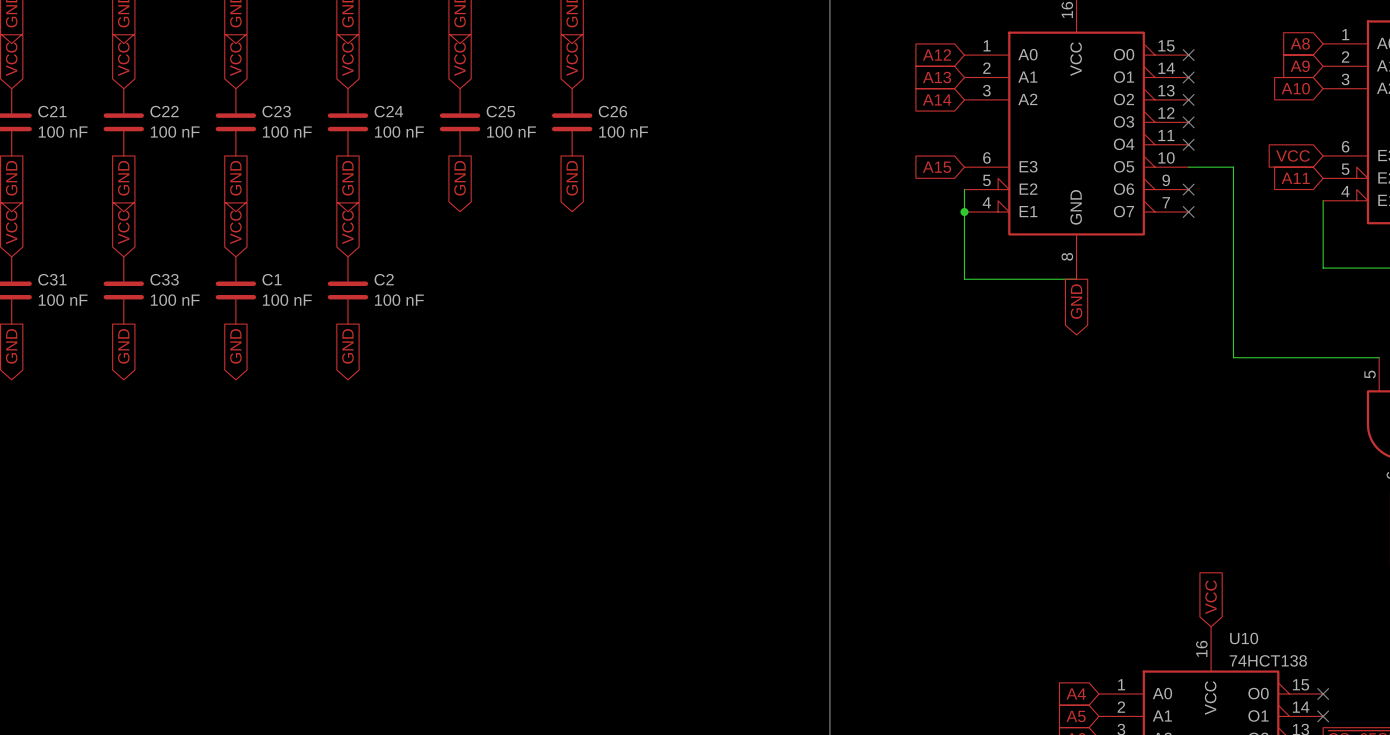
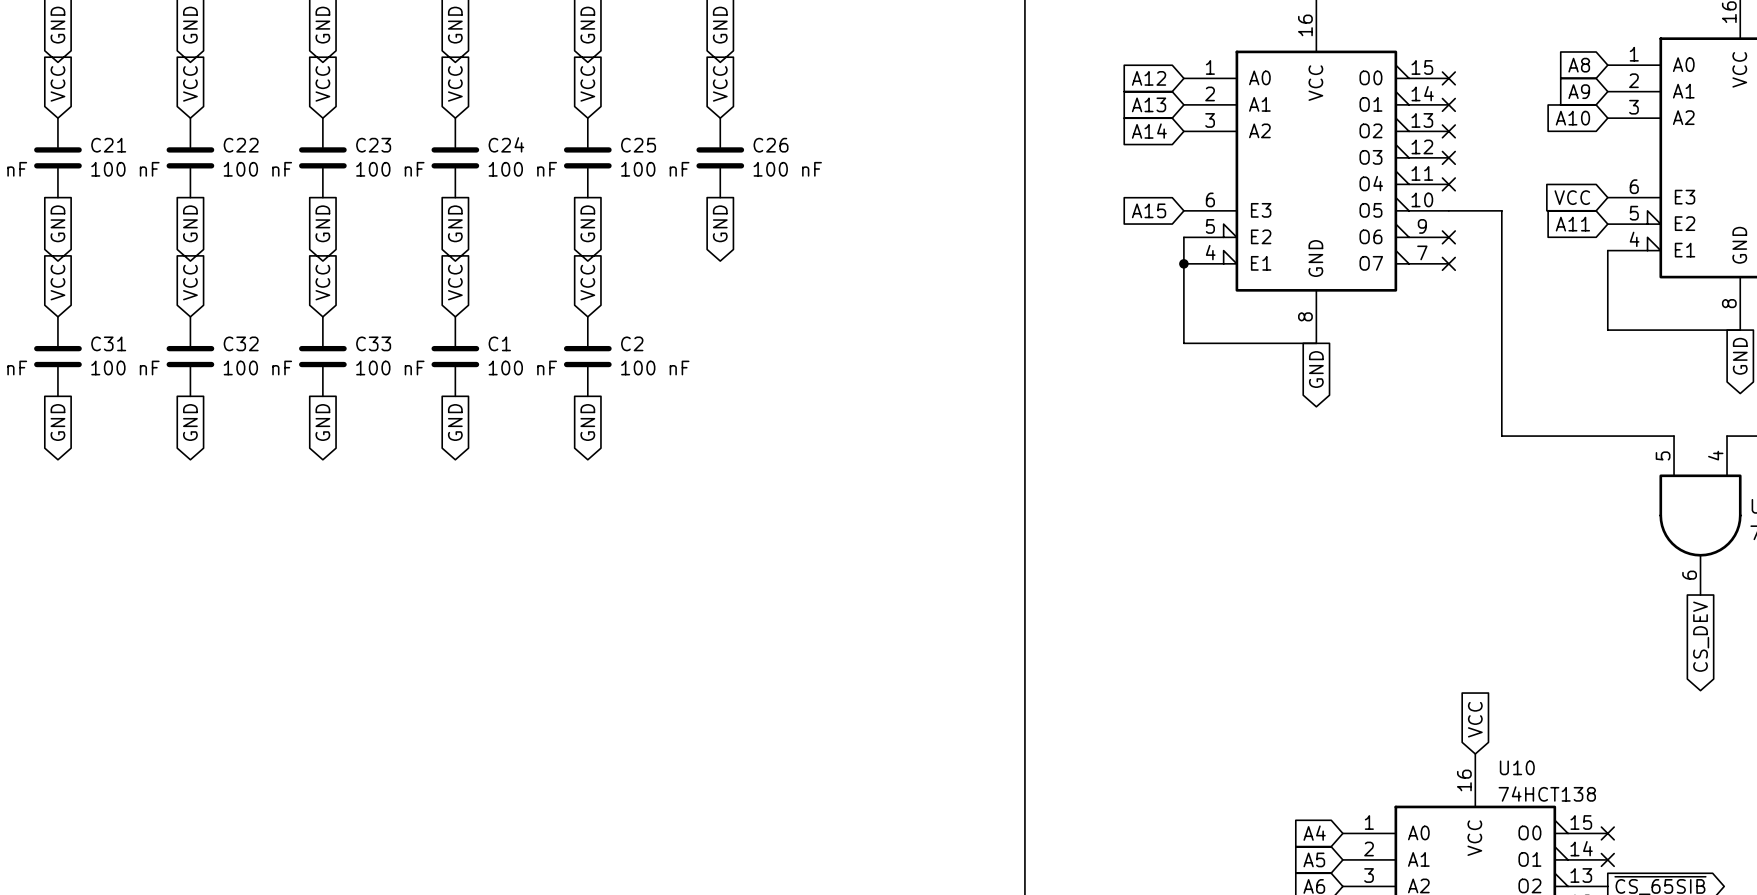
global label: none -> VCC (587, 282)
C33 name: C33 (164, 279) -> C32 (241, 343)
C1 name: C1 (272, 279) -> C33 (373, 343)
C2 name: C2 (384, 279) -> C1 (499, 343)
C2: none -> 100 nF (587, 356)
global label: none -> GND (587, 422)

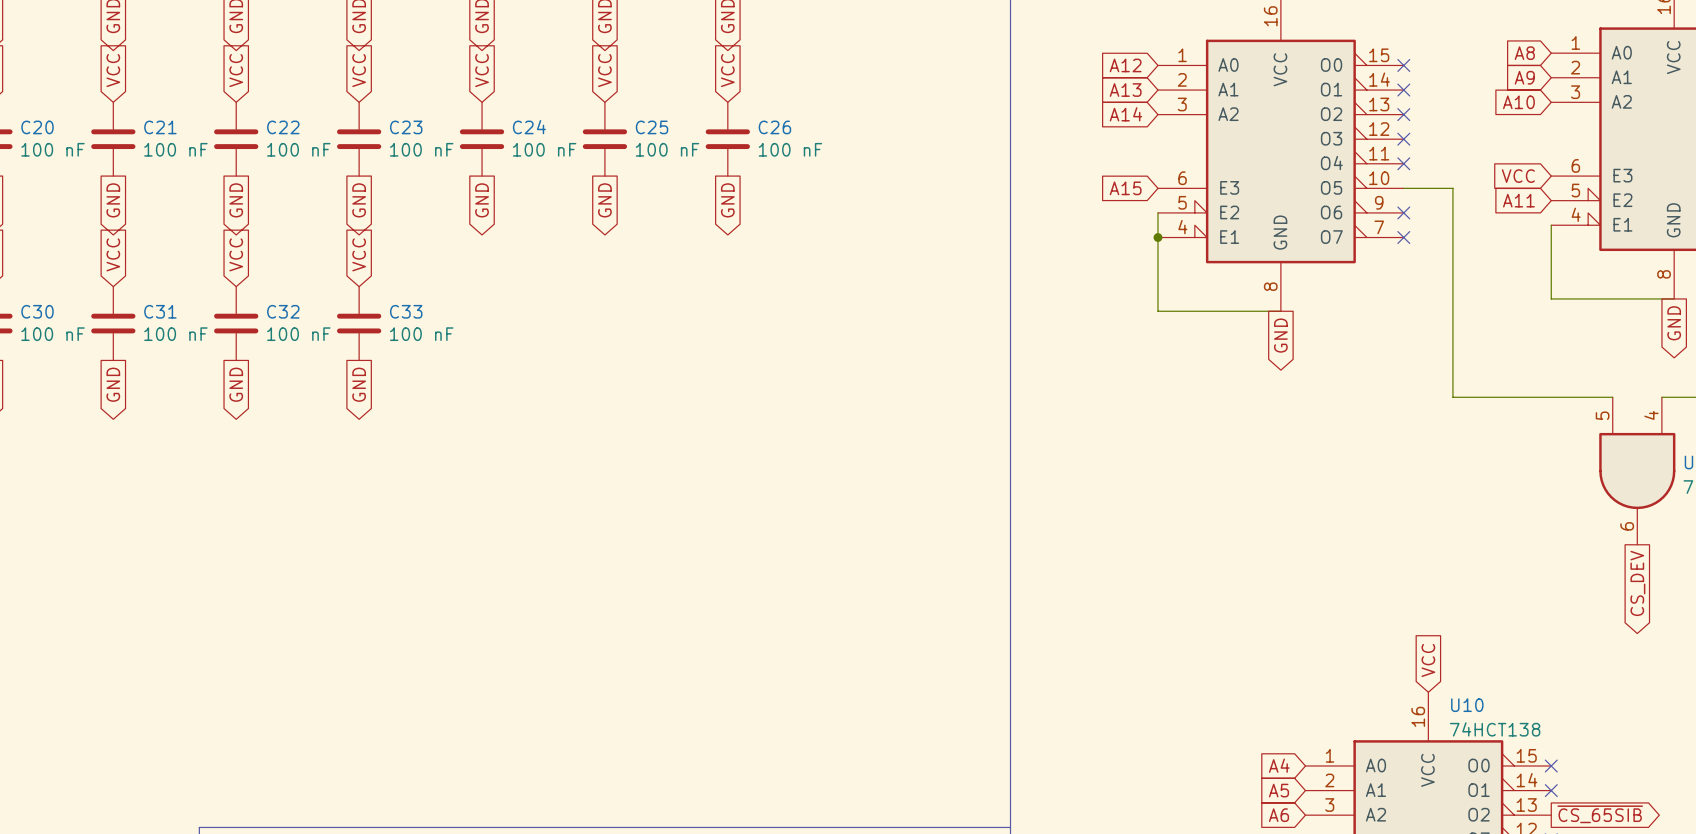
global label: VCC (455, 282) -> none
global label: VCC (587, 282) -> none
C1: 100 nF (455, 356) -> none
C2: 100 nF (587, 356) -> none
global label: GND (455, 422) -> none
global label: GND (587, 422) -> none

